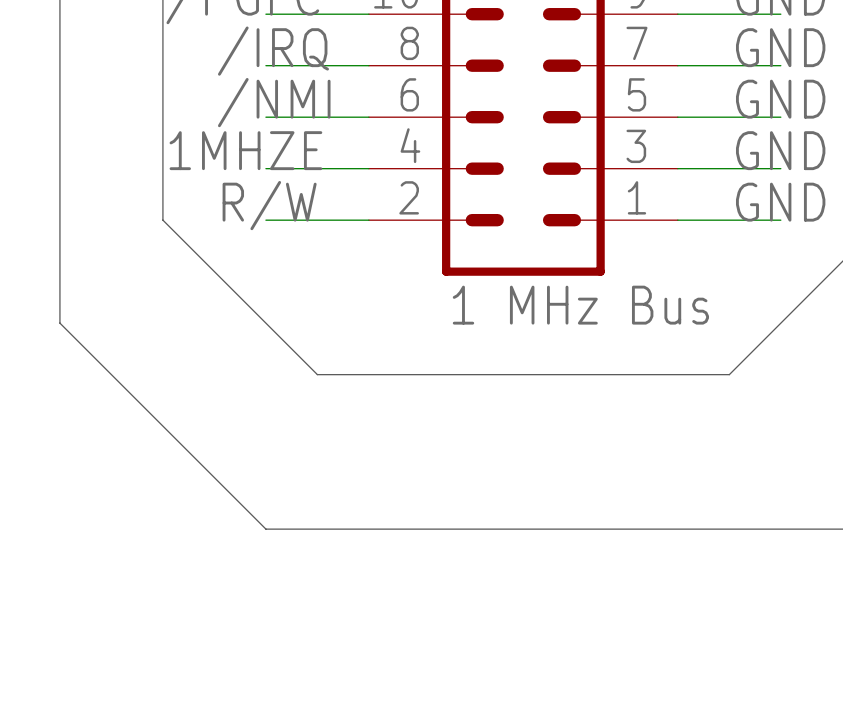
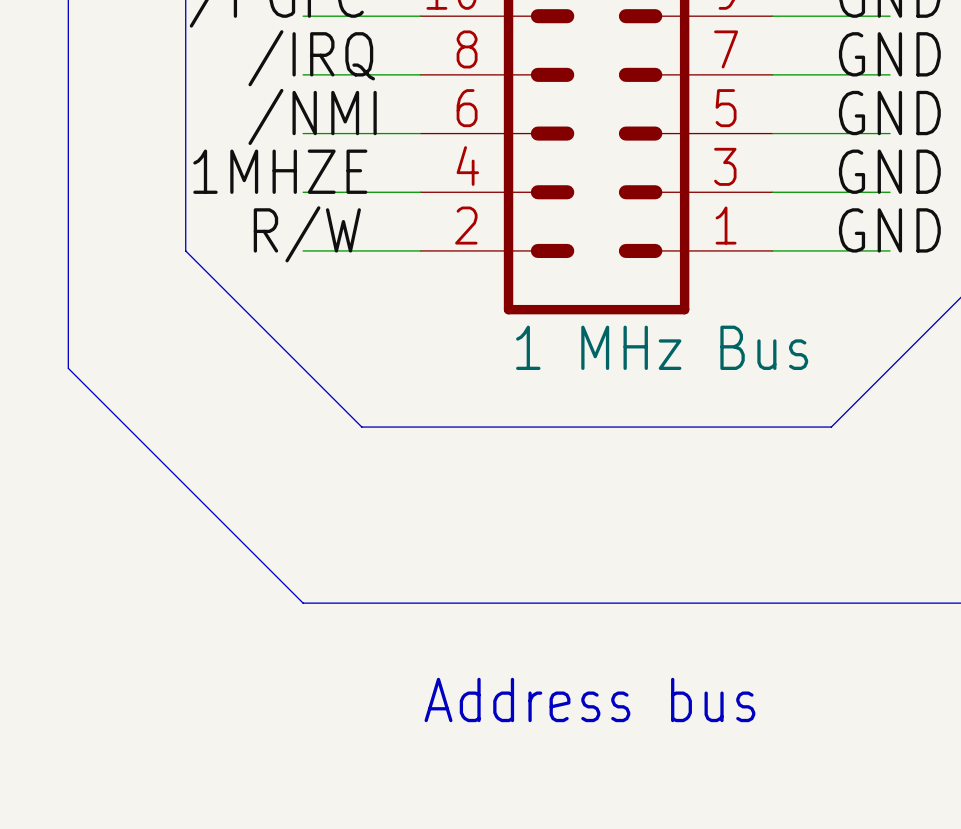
text: none -> Address bus (589, 699)

